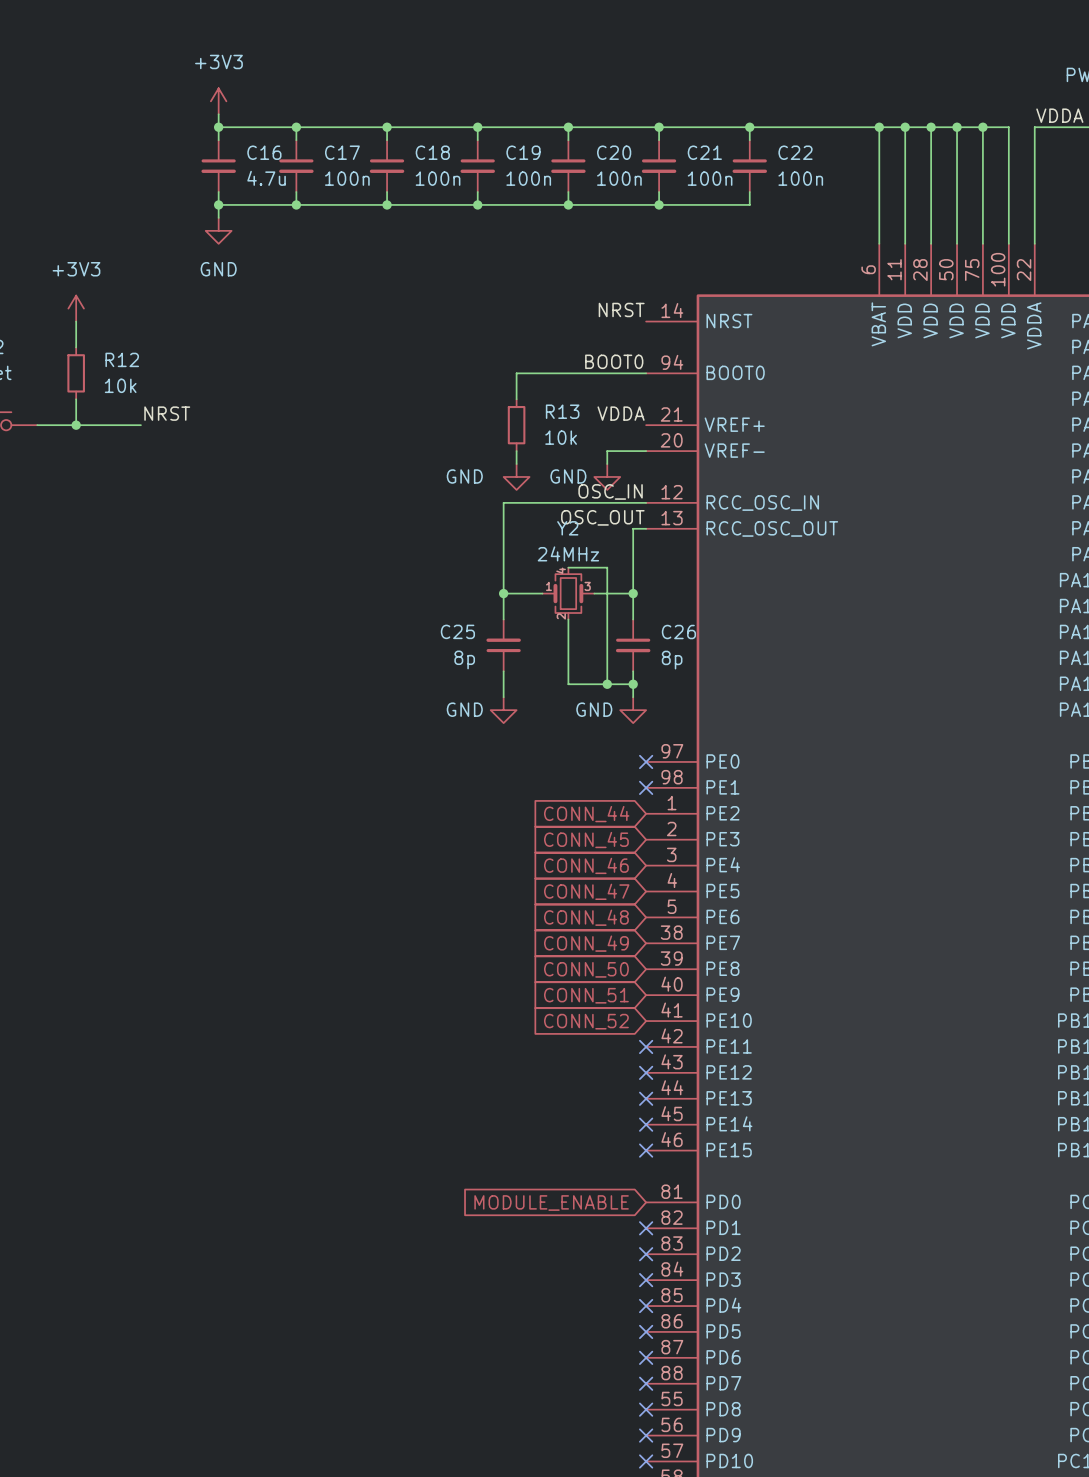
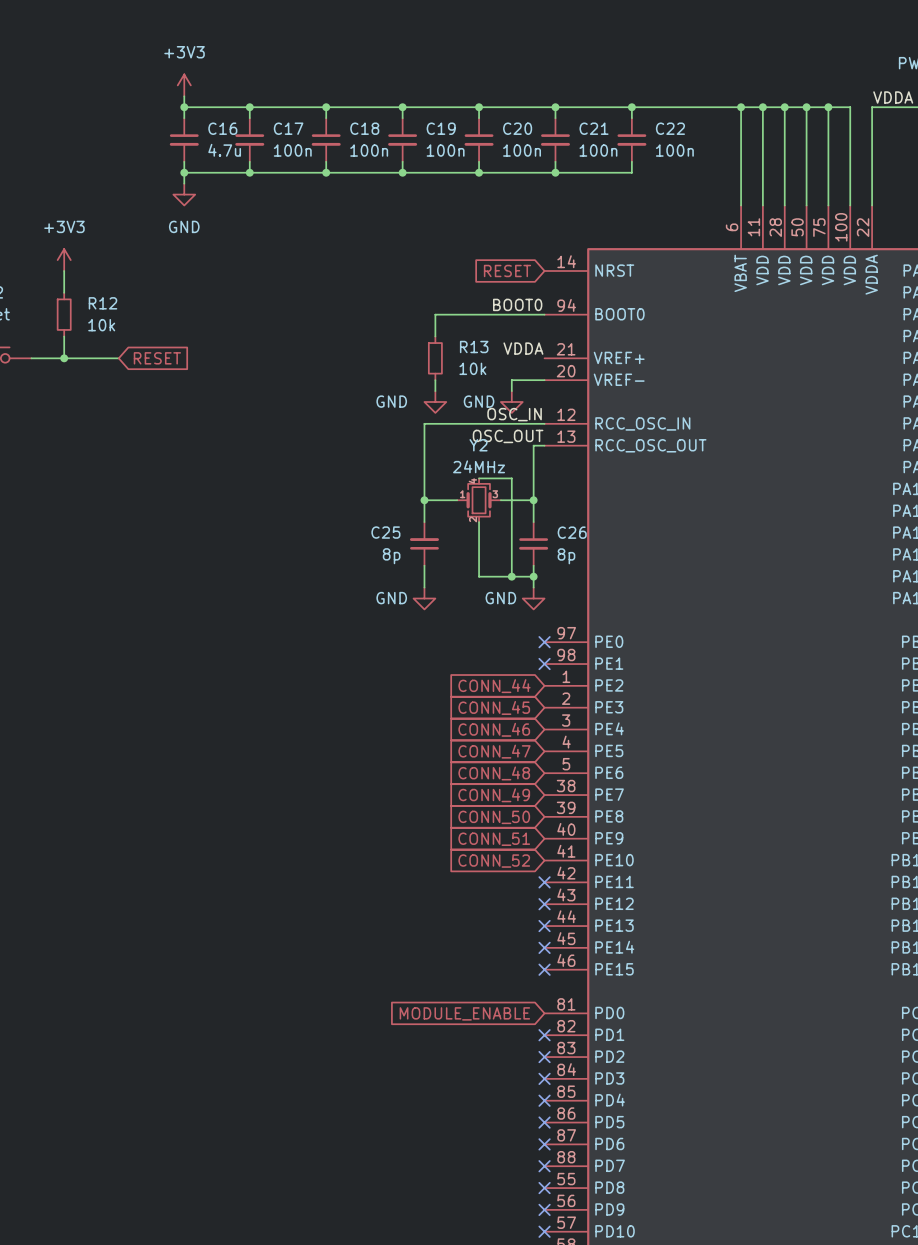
label: NRST (621, 309) -> none
global label: none -> RESET (507, 270)
label: NRST (167, 413) -> none
global label: none -> RESET (157, 358)

